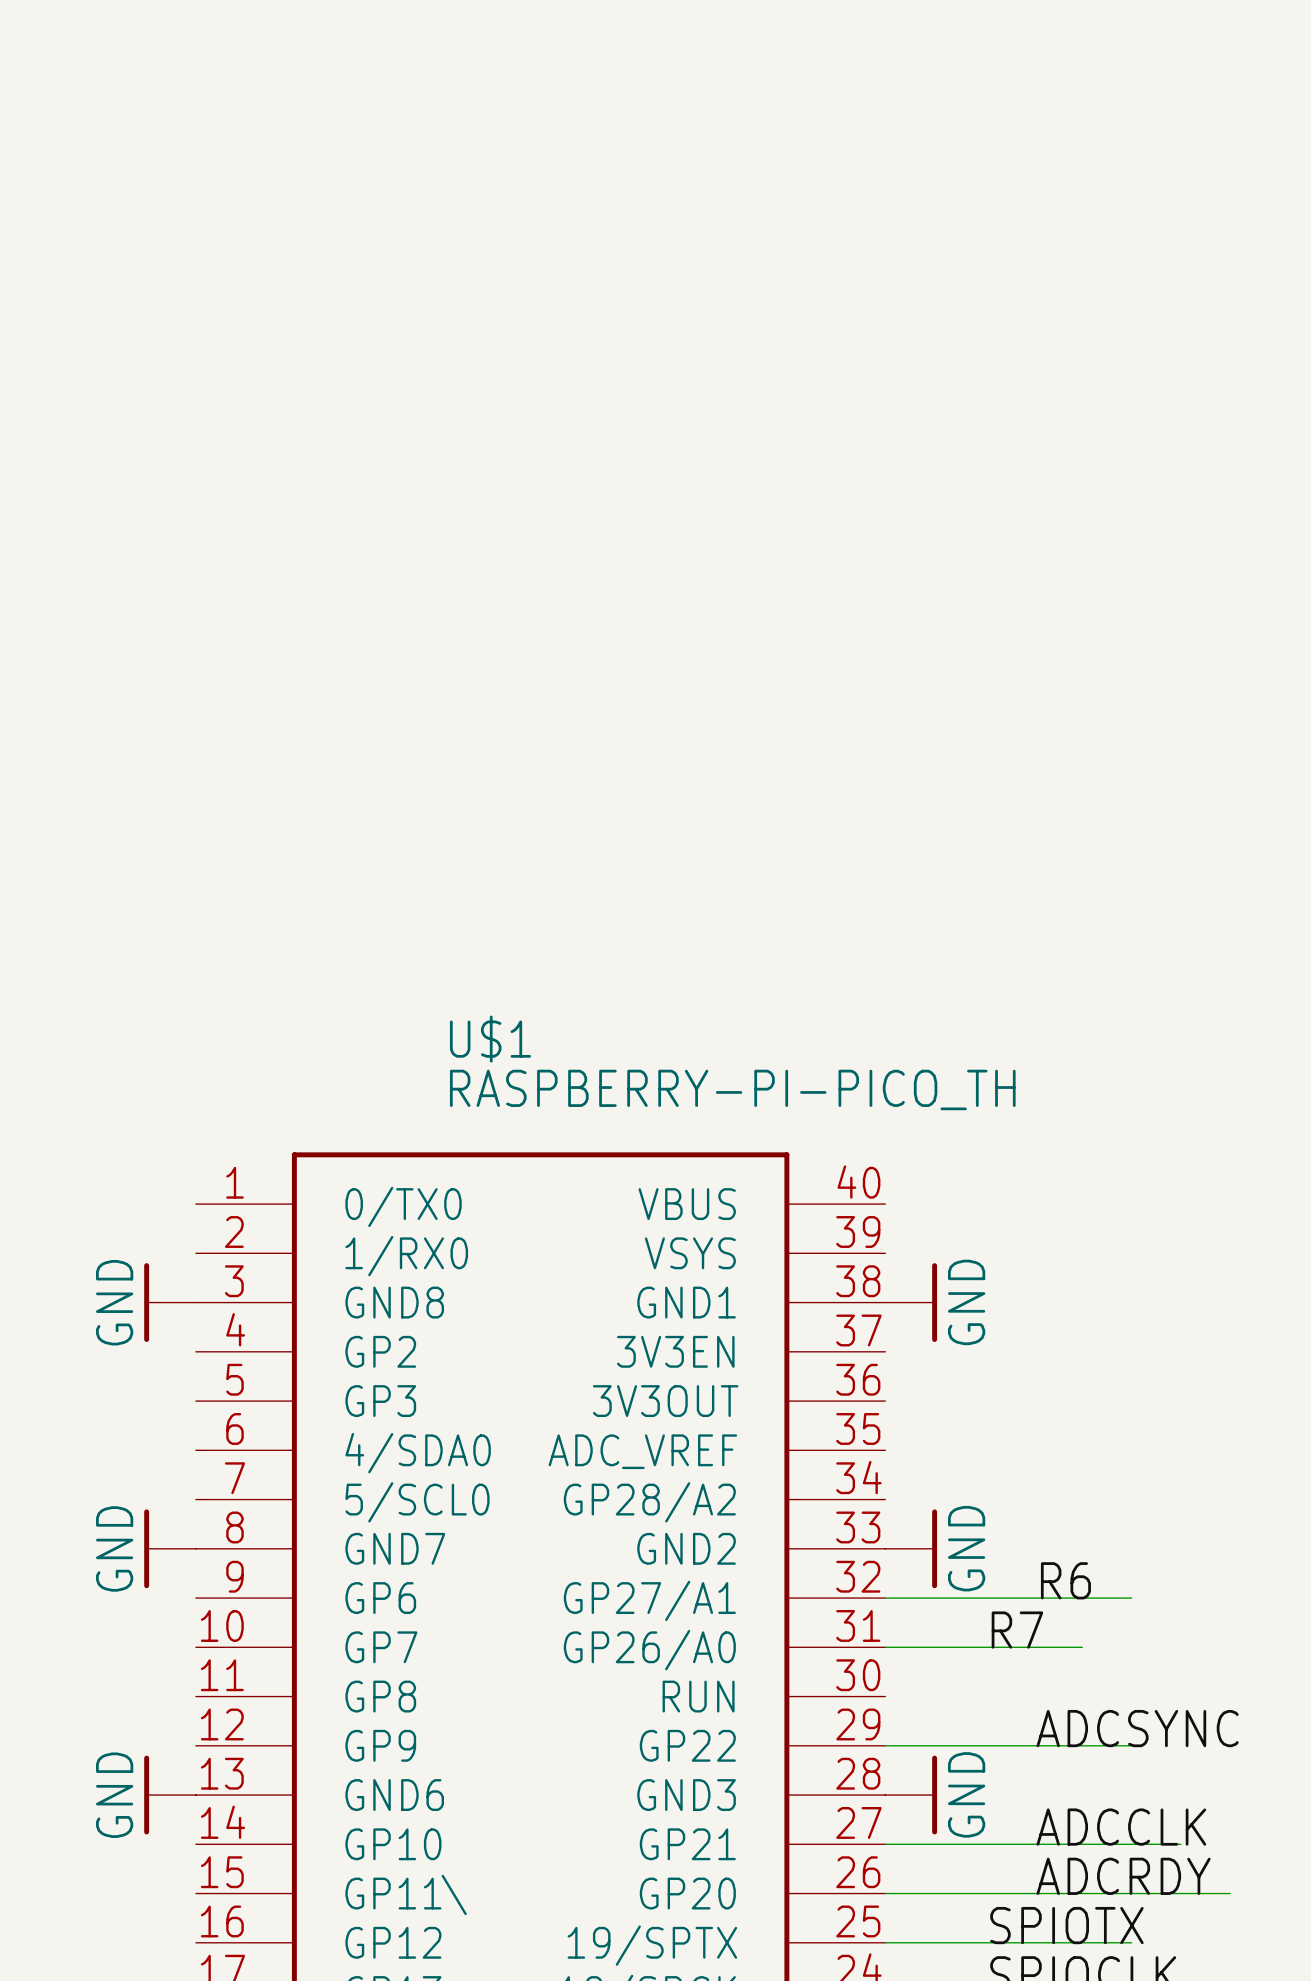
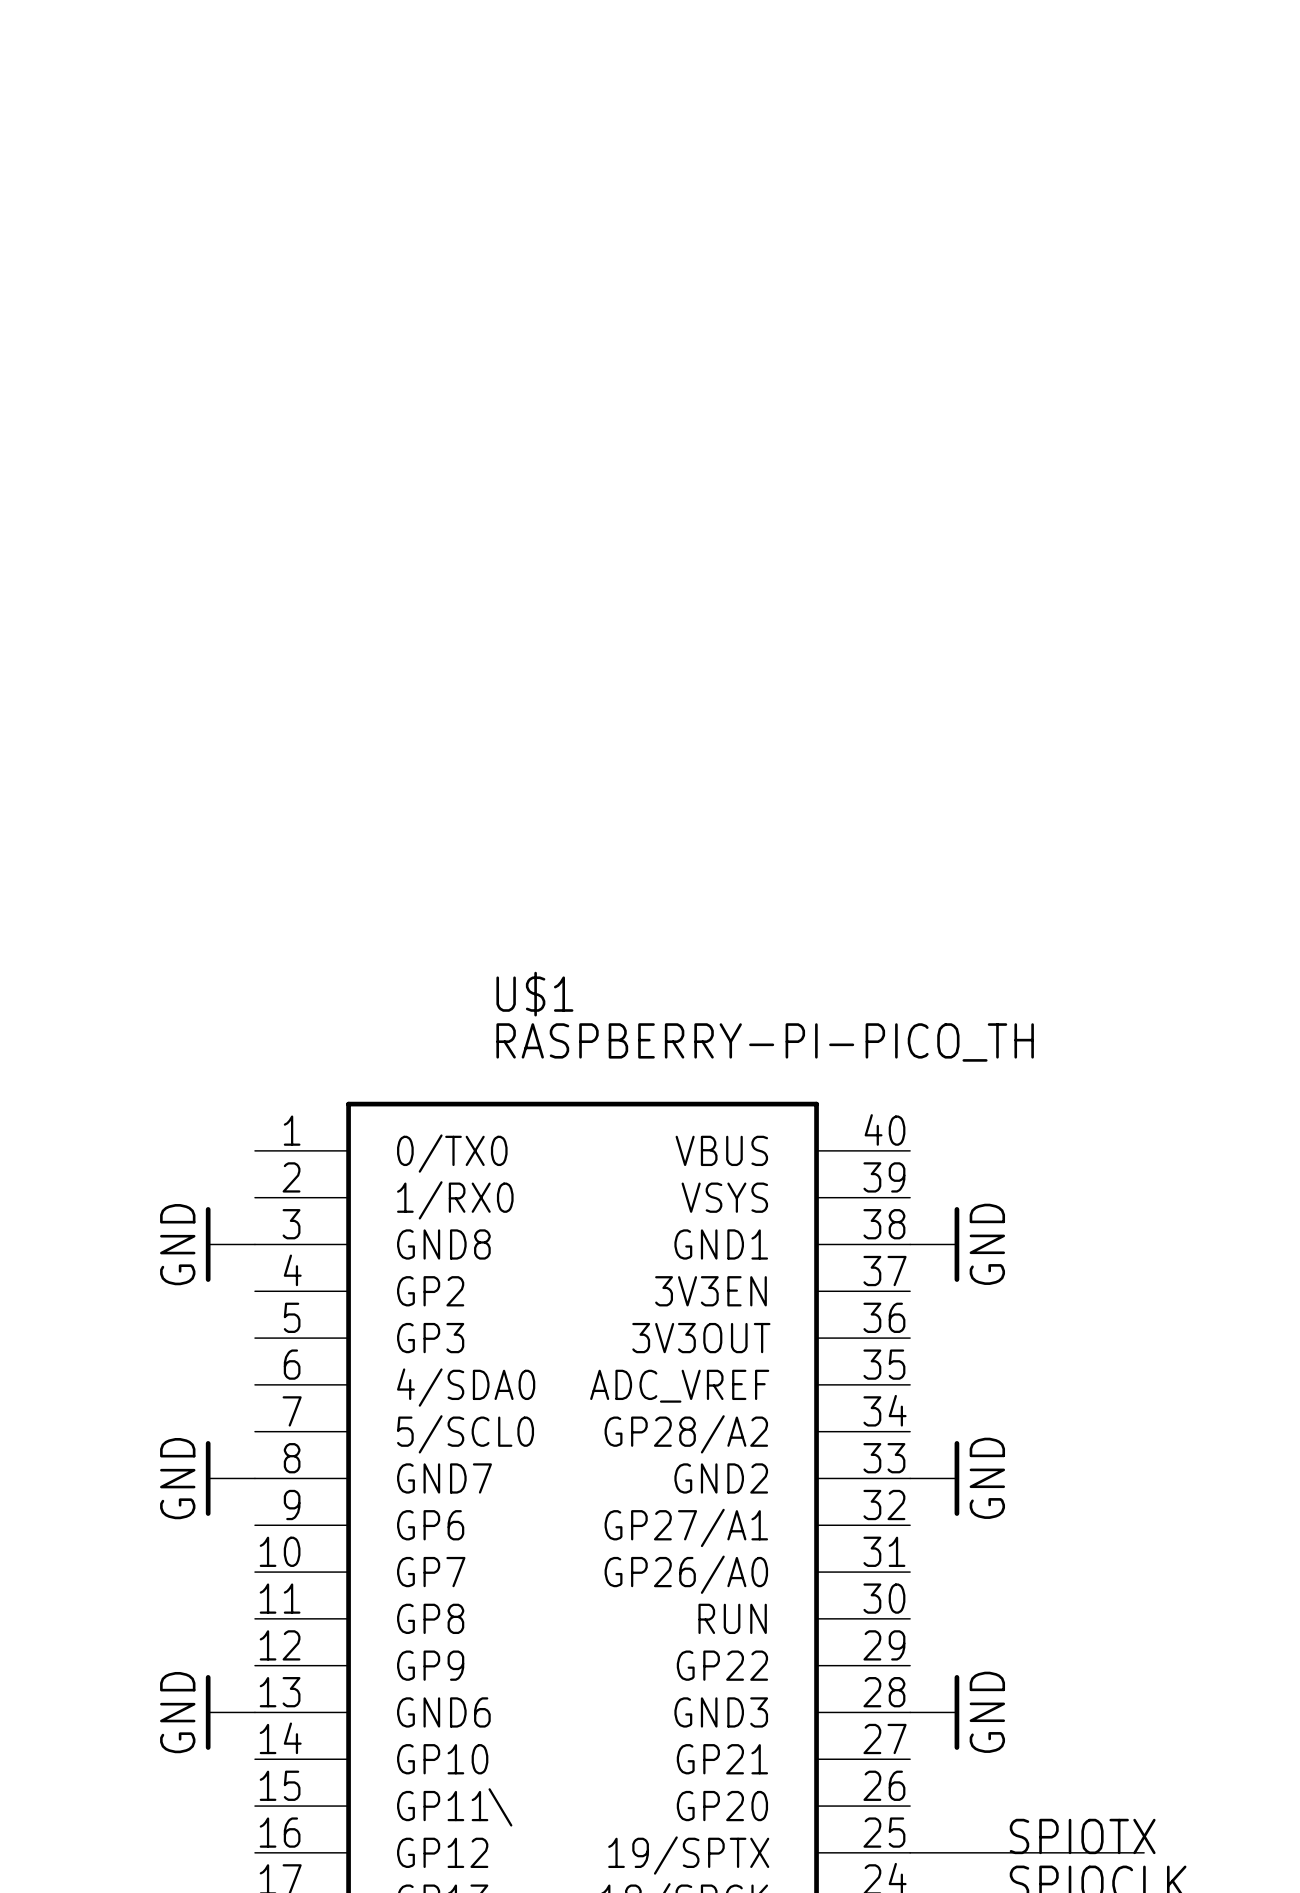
label: R6 (1065, 1580) -> none
wire: (885, 1598) (1131, 1598) -> none
label: R7 (1017, 1630) -> none
wire: (885, 1647) (1082, 1647) -> none
label: ADCSYNC (1137, 1728) -> none
wire: (885, 1745) (1131, 1745) -> none
label: ADCCLK (1121, 1827) -> none
wire: (885, 1844) (1180, 1844) -> none
label: ADCRDY (1123, 1876) -> none
wire: (885, 1893) (1230, 1893) -> none

